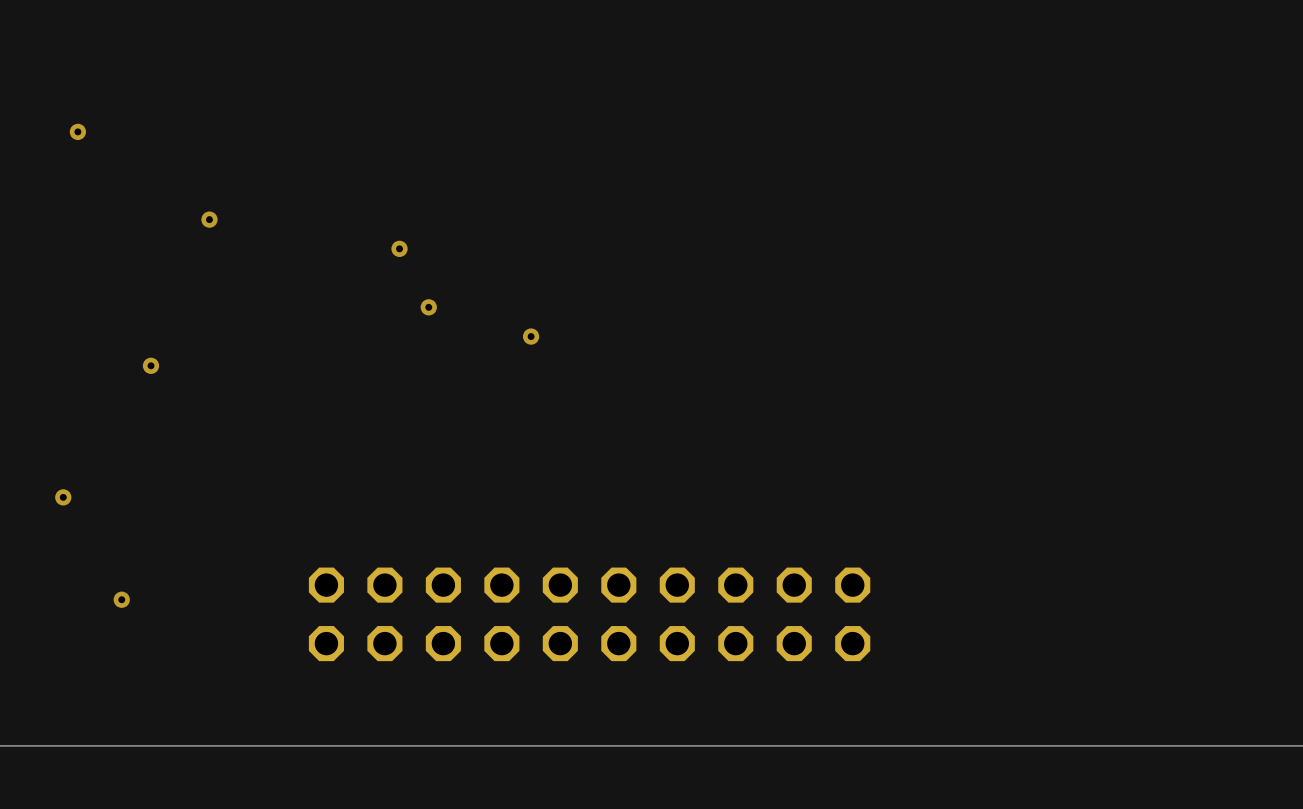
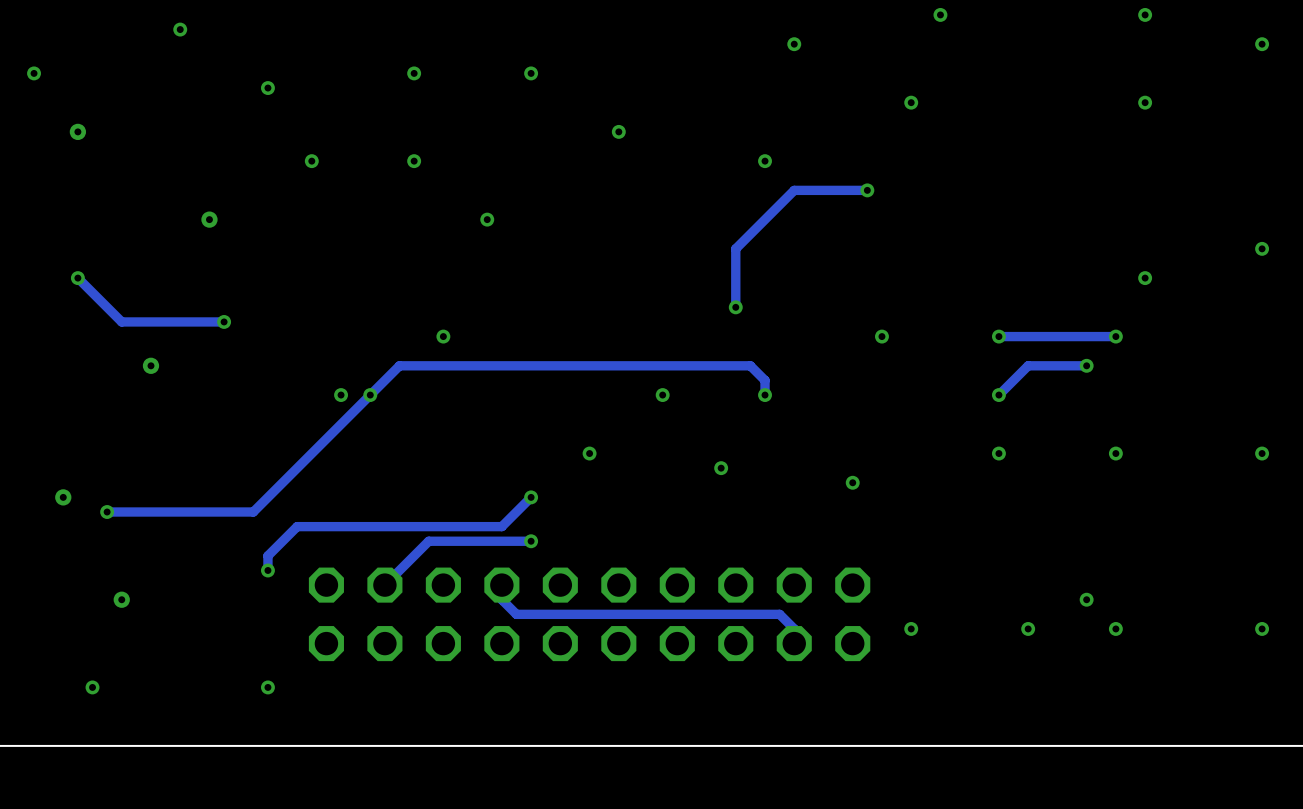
via: none -> (940, 14)
via: none -> (1145, 14)
via: none -> (180, 29)
via: none -> (794, 44)
via: none -> (1262, 44)
via: none -> (34, 73)
via: none -> (414, 73)
via: none -> (531, 73)
via: none -> (267, 88)
via: none -> (911, 102)
via: none -> (1145, 102)
via: none -> (618, 131)
via: none -> (311, 161)
via: none -> (414, 161)
via: none -> (765, 161)
track: none -> (867, 190) (794, 190) (735, 248) (735, 307)
via: none -> (867, 190)
via: none -> (487, 219)
via: (399, 248) -> none
via: none -> (1262, 248)
track: none -> (77, 278) (121, 321) (224, 321)
via: none -> (77, 278)
via: none -> (1145, 278)
via: (428, 307) -> none
via: none -> (735, 307)
via: none -> (224, 321)
via: none -> (443, 336)
via: (531, 336) -> none
via: none -> (881, 336)
via: none -> (998, 336)
track: none -> (1115, 336) (998, 336)
via: none -> (1115, 336)
track: none -> (1086, 365) (1028, 365) (998, 395)
via: none -> (1086, 365)
via: none -> (341, 395)
via: none -> (370, 395)
via: none -> (662, 395)
track: none -> (765, 395) (765, 380) (750, 365) (399, 365) (253, 512) (107, 512)
via: none -> (765, 395)
via: none -> (998, 395)
via: none -> (589, 453)
via: none -> (998, 453)
via: none -> (1115, 453)
via: none -> (1262, 453)
via: none -> (721, 468)
via: none -> (852, 482)
track: none -> (531, 497) (501, 526) (297, 526) (267, 555) (267, 570)
via: none -> (531, 497)
via: none -> (107, 512)
track: none -> (531, 541) (428, 541) (384, 585)
via: none -> (531, 541)
via: none -> (267, 570)
track: none -> (501, 585) (501, 599) (516, 614) (779, 614) (794, 628) (794, 643)
via: none -> (1086, 599)
via: none -> (911, 628)
via: none -> (1028, 628)
via: none -> (1115, 628)
via: none -> (1262, 628)
via: none -> (92, 687)
via: none -> (267, 687)

